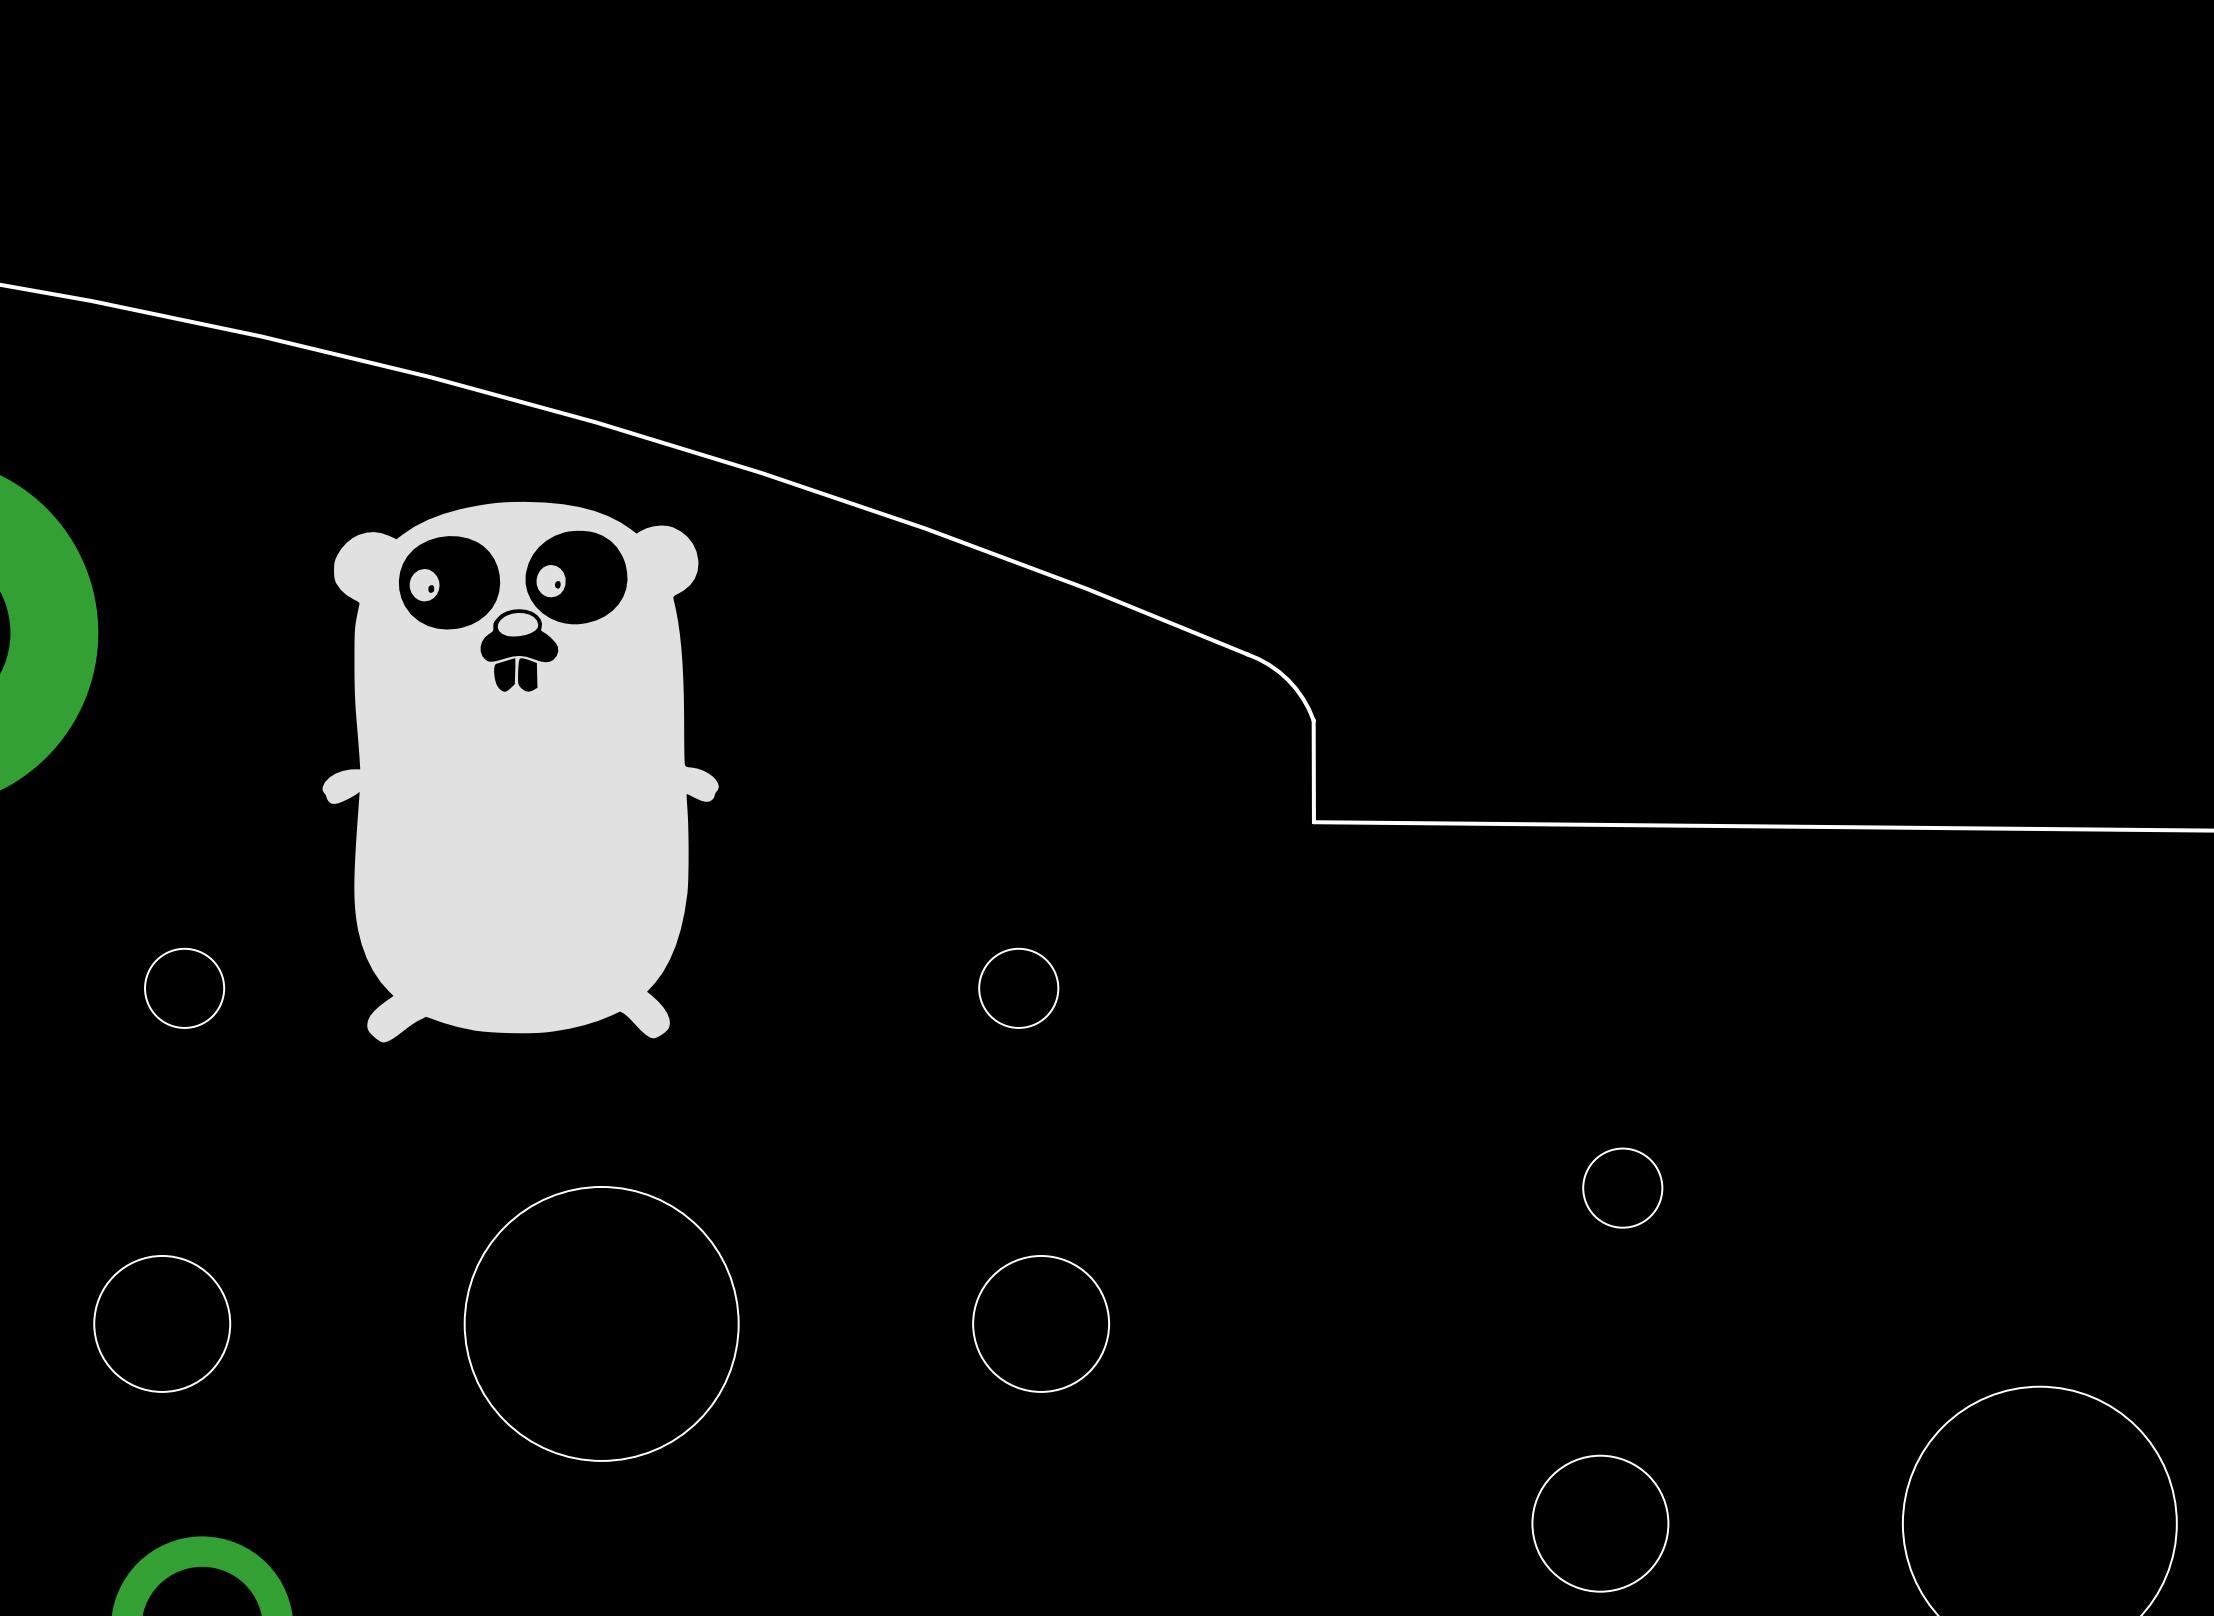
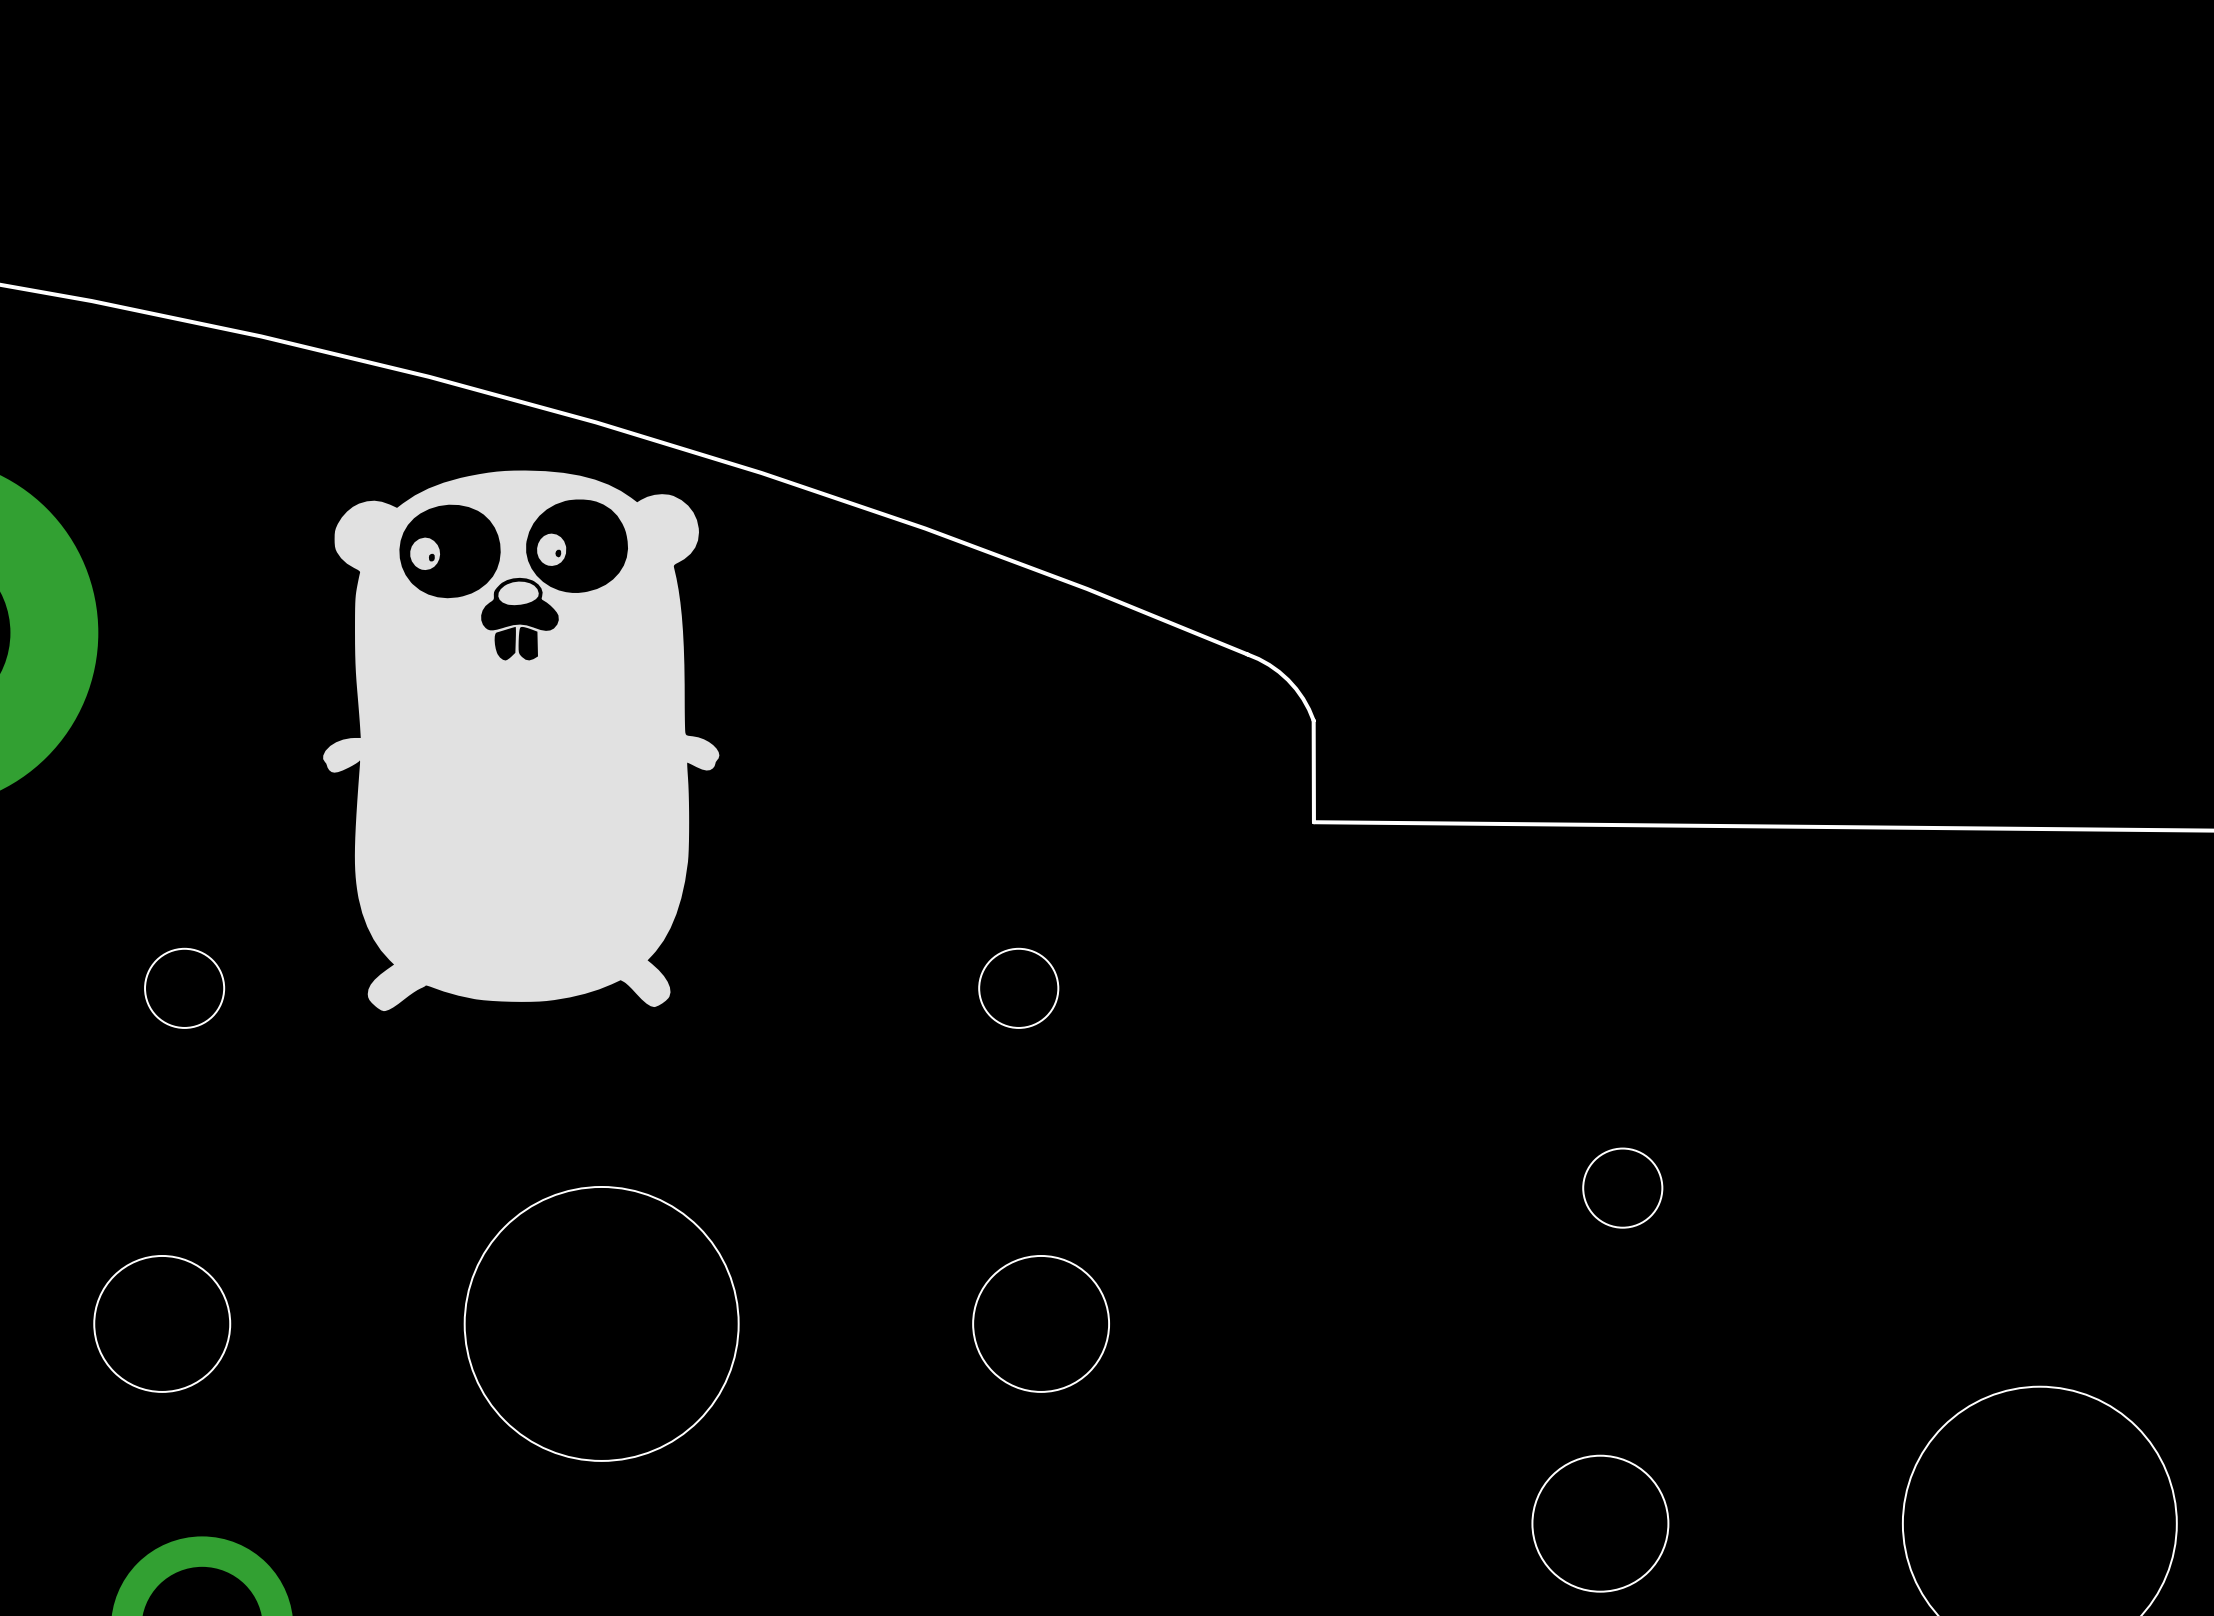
drawing position: (520, 772) -> (521, 740)

